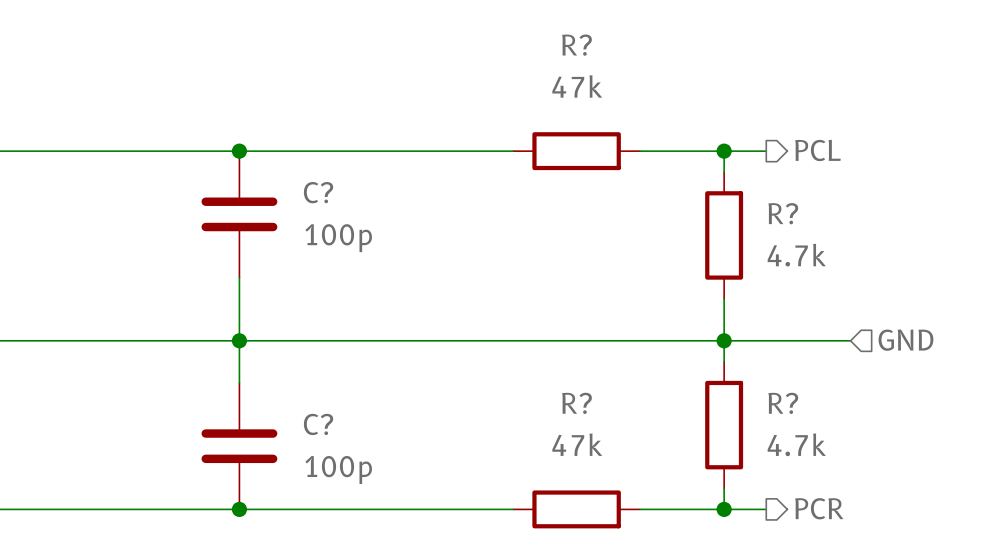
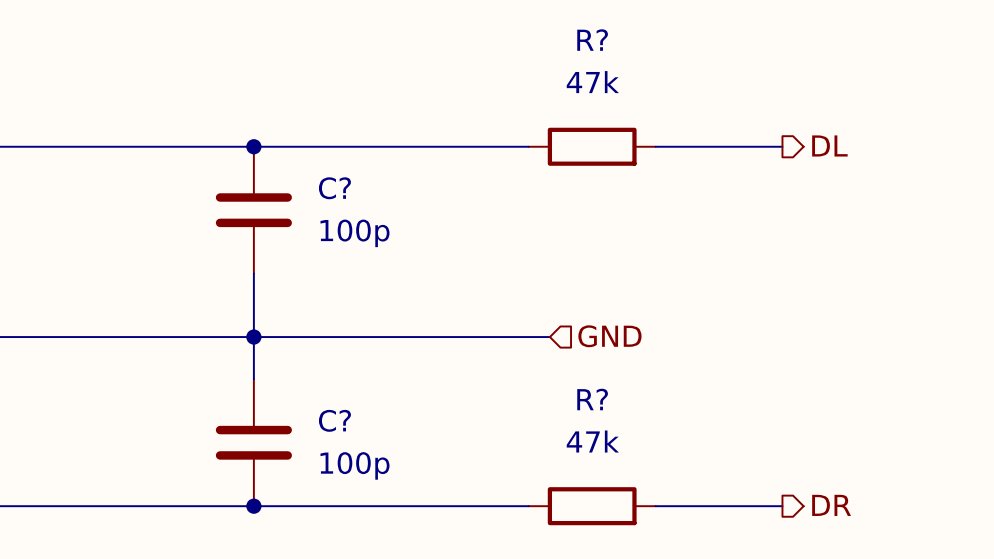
hierarchical label: PCL (817, 150) -> DL (829, 145)
wire: (724, 151) (724, 172) -> none
junction: (724, 151) -> none
R?: 4.7k (724, 235) -> none
wire: (724, 298) (724, 361) -> none
wire: (534, 340) (850, 340) -> none
junction: (724, 340) -> none
hierarchical label position: GND (905, 340) -> GND (609, 336)
R?: 4.7k (724, 425) -> none
wire: (724, 488) (724, 509) -> none
hierarchical label: PCR (819, 508) -> DR (831, 505)
junction: (724, 509) -> none

